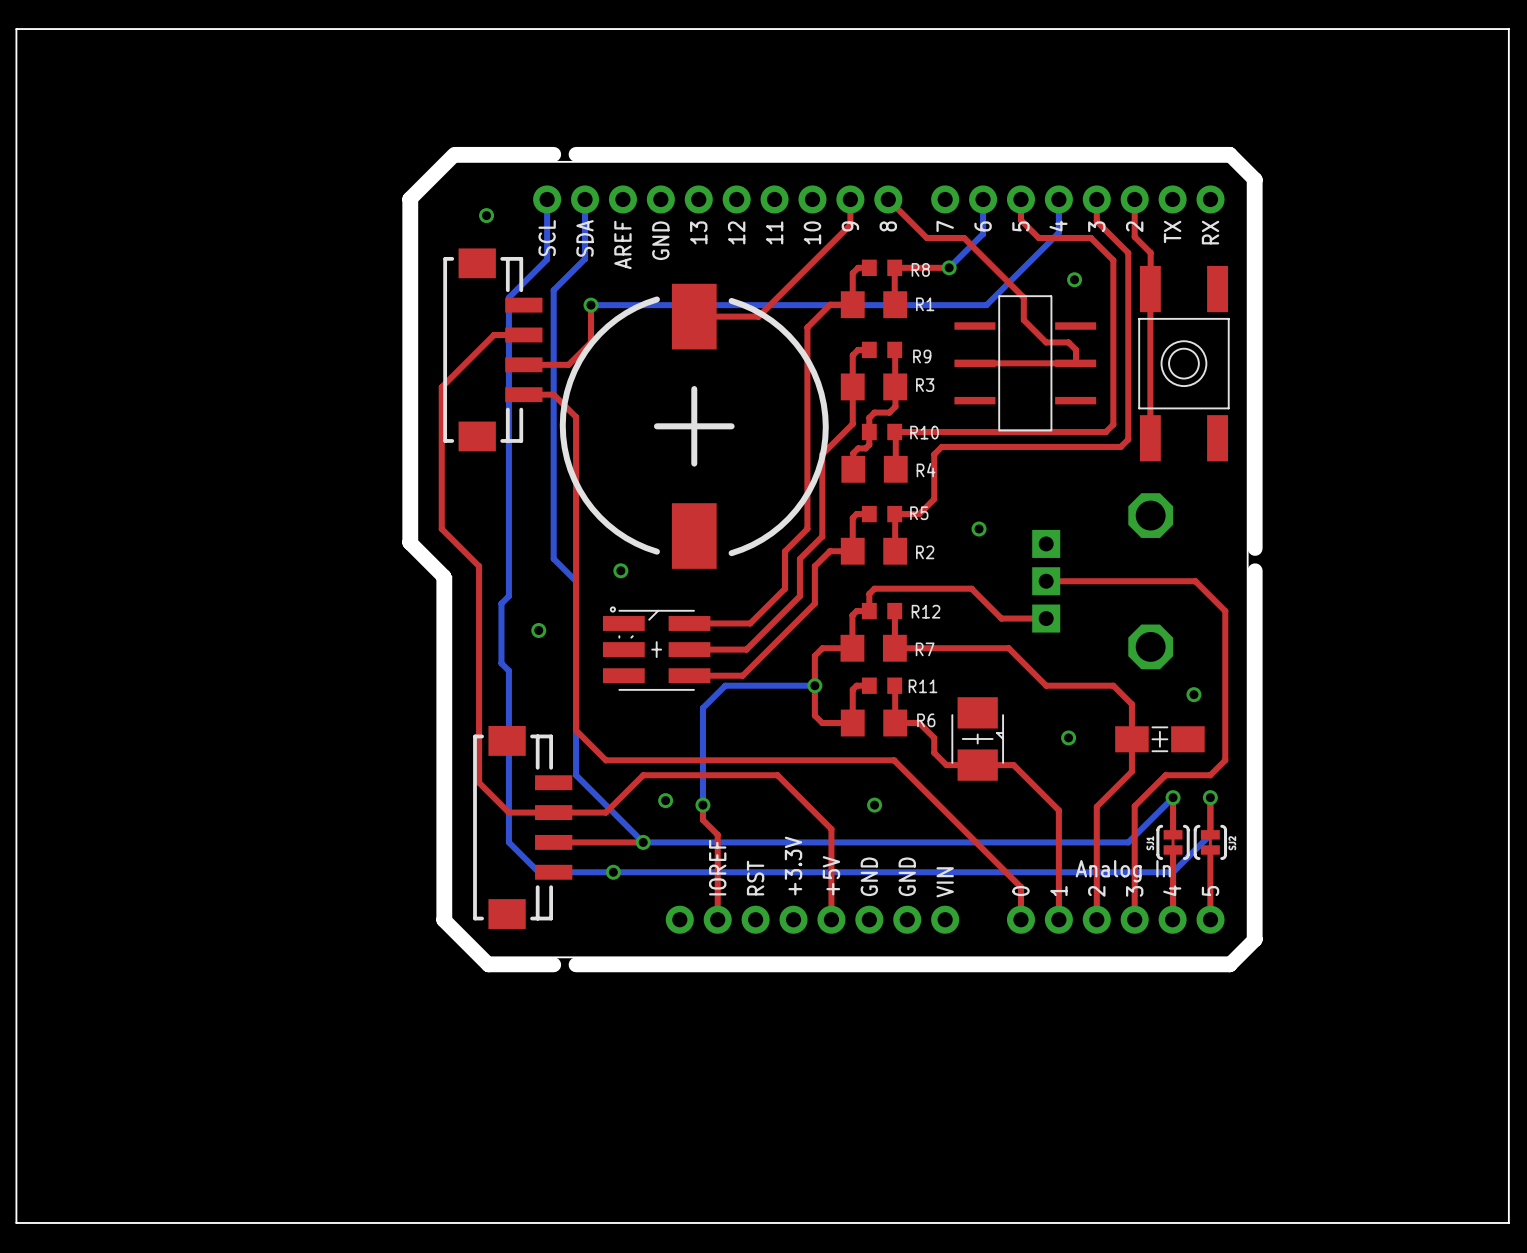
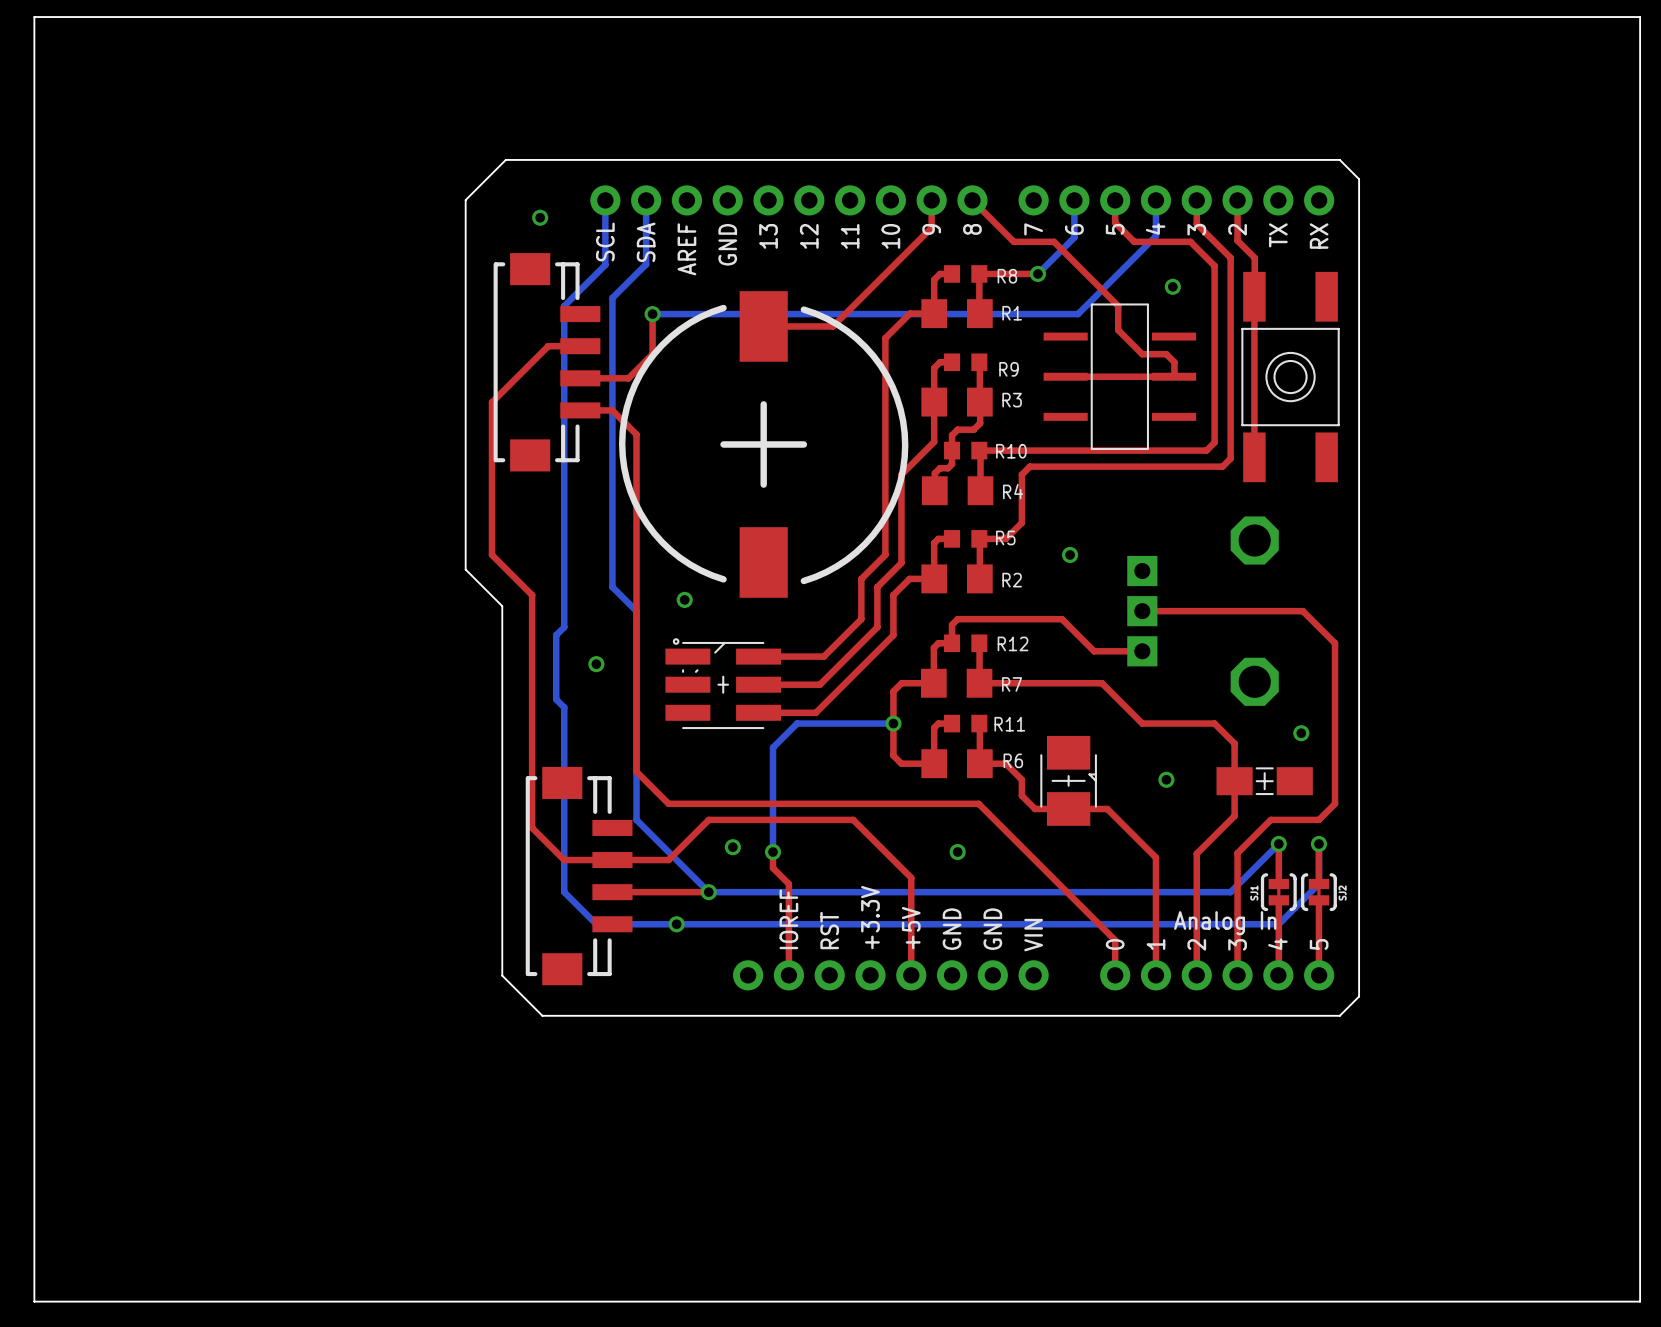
board edge: (454, 154) (409, 199) (409, 542) (443, 576) (443, 920) (488, 964) (553, 964) -> none
board edge: (456, 154) (553, 154) -> none
board edge: (576, 154) (1229, 154) (1255, 179) (1255, 548) -> none
board edge: (1255, 570) (1255, 939) (1229, 964) (576, 964) -> none

